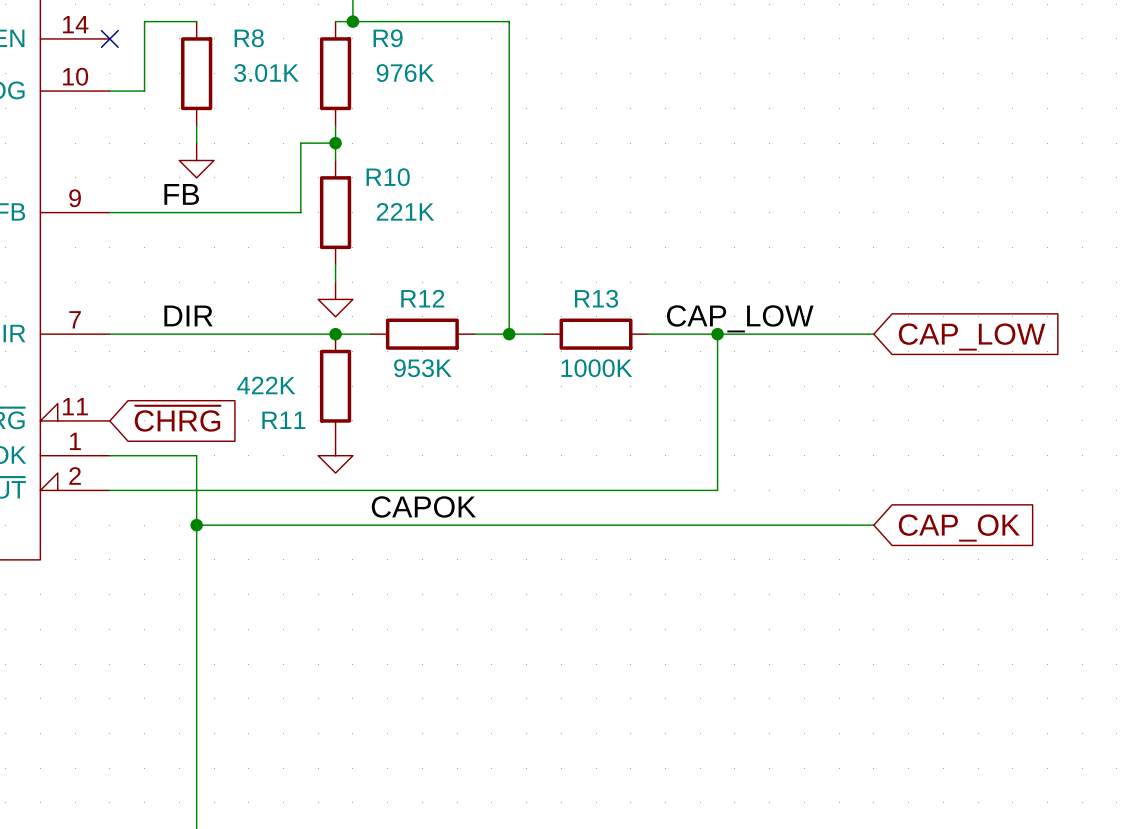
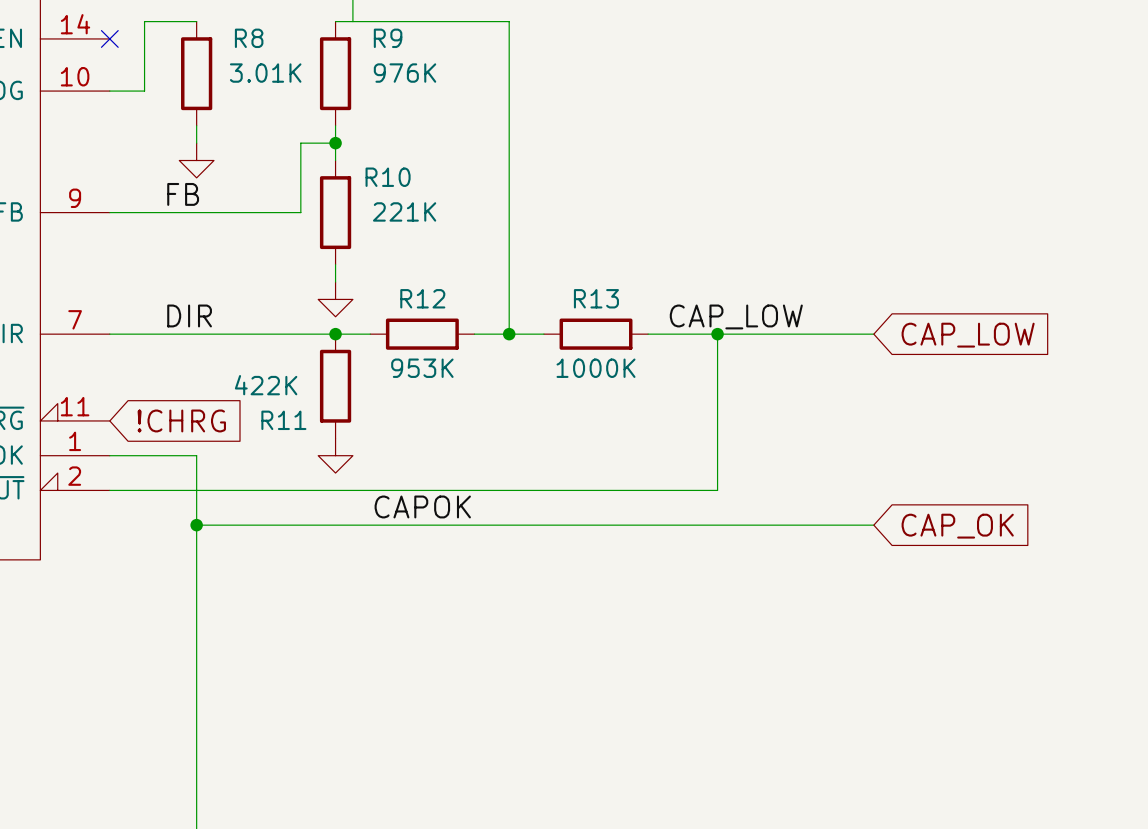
junction: (352, 21) -> none
global label: ~{CHRG} (177, 418) -> !CHRG (181, 420)

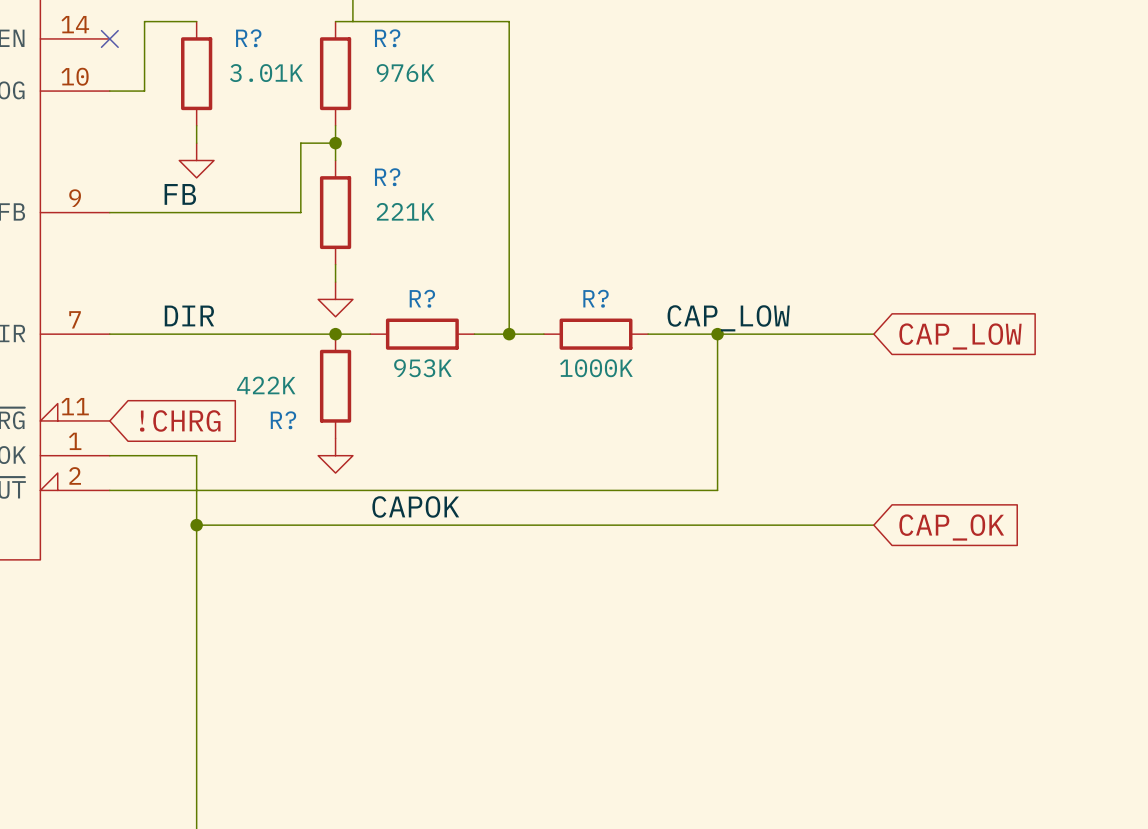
R8 name: R8 (249, 38) -> R? (248, 38)
R9 name: R9 (388, 38) -> R? (387, 38)
R10 name: R10 (388, 177) -> R? (387, 177)
R12 name: R12 (422, 298) -> R? (422, 298)
R13 name: R13 (596, 298) -> R? (596, 298)
R11 name: R11 (283, 420) -> R? (283, 420)

